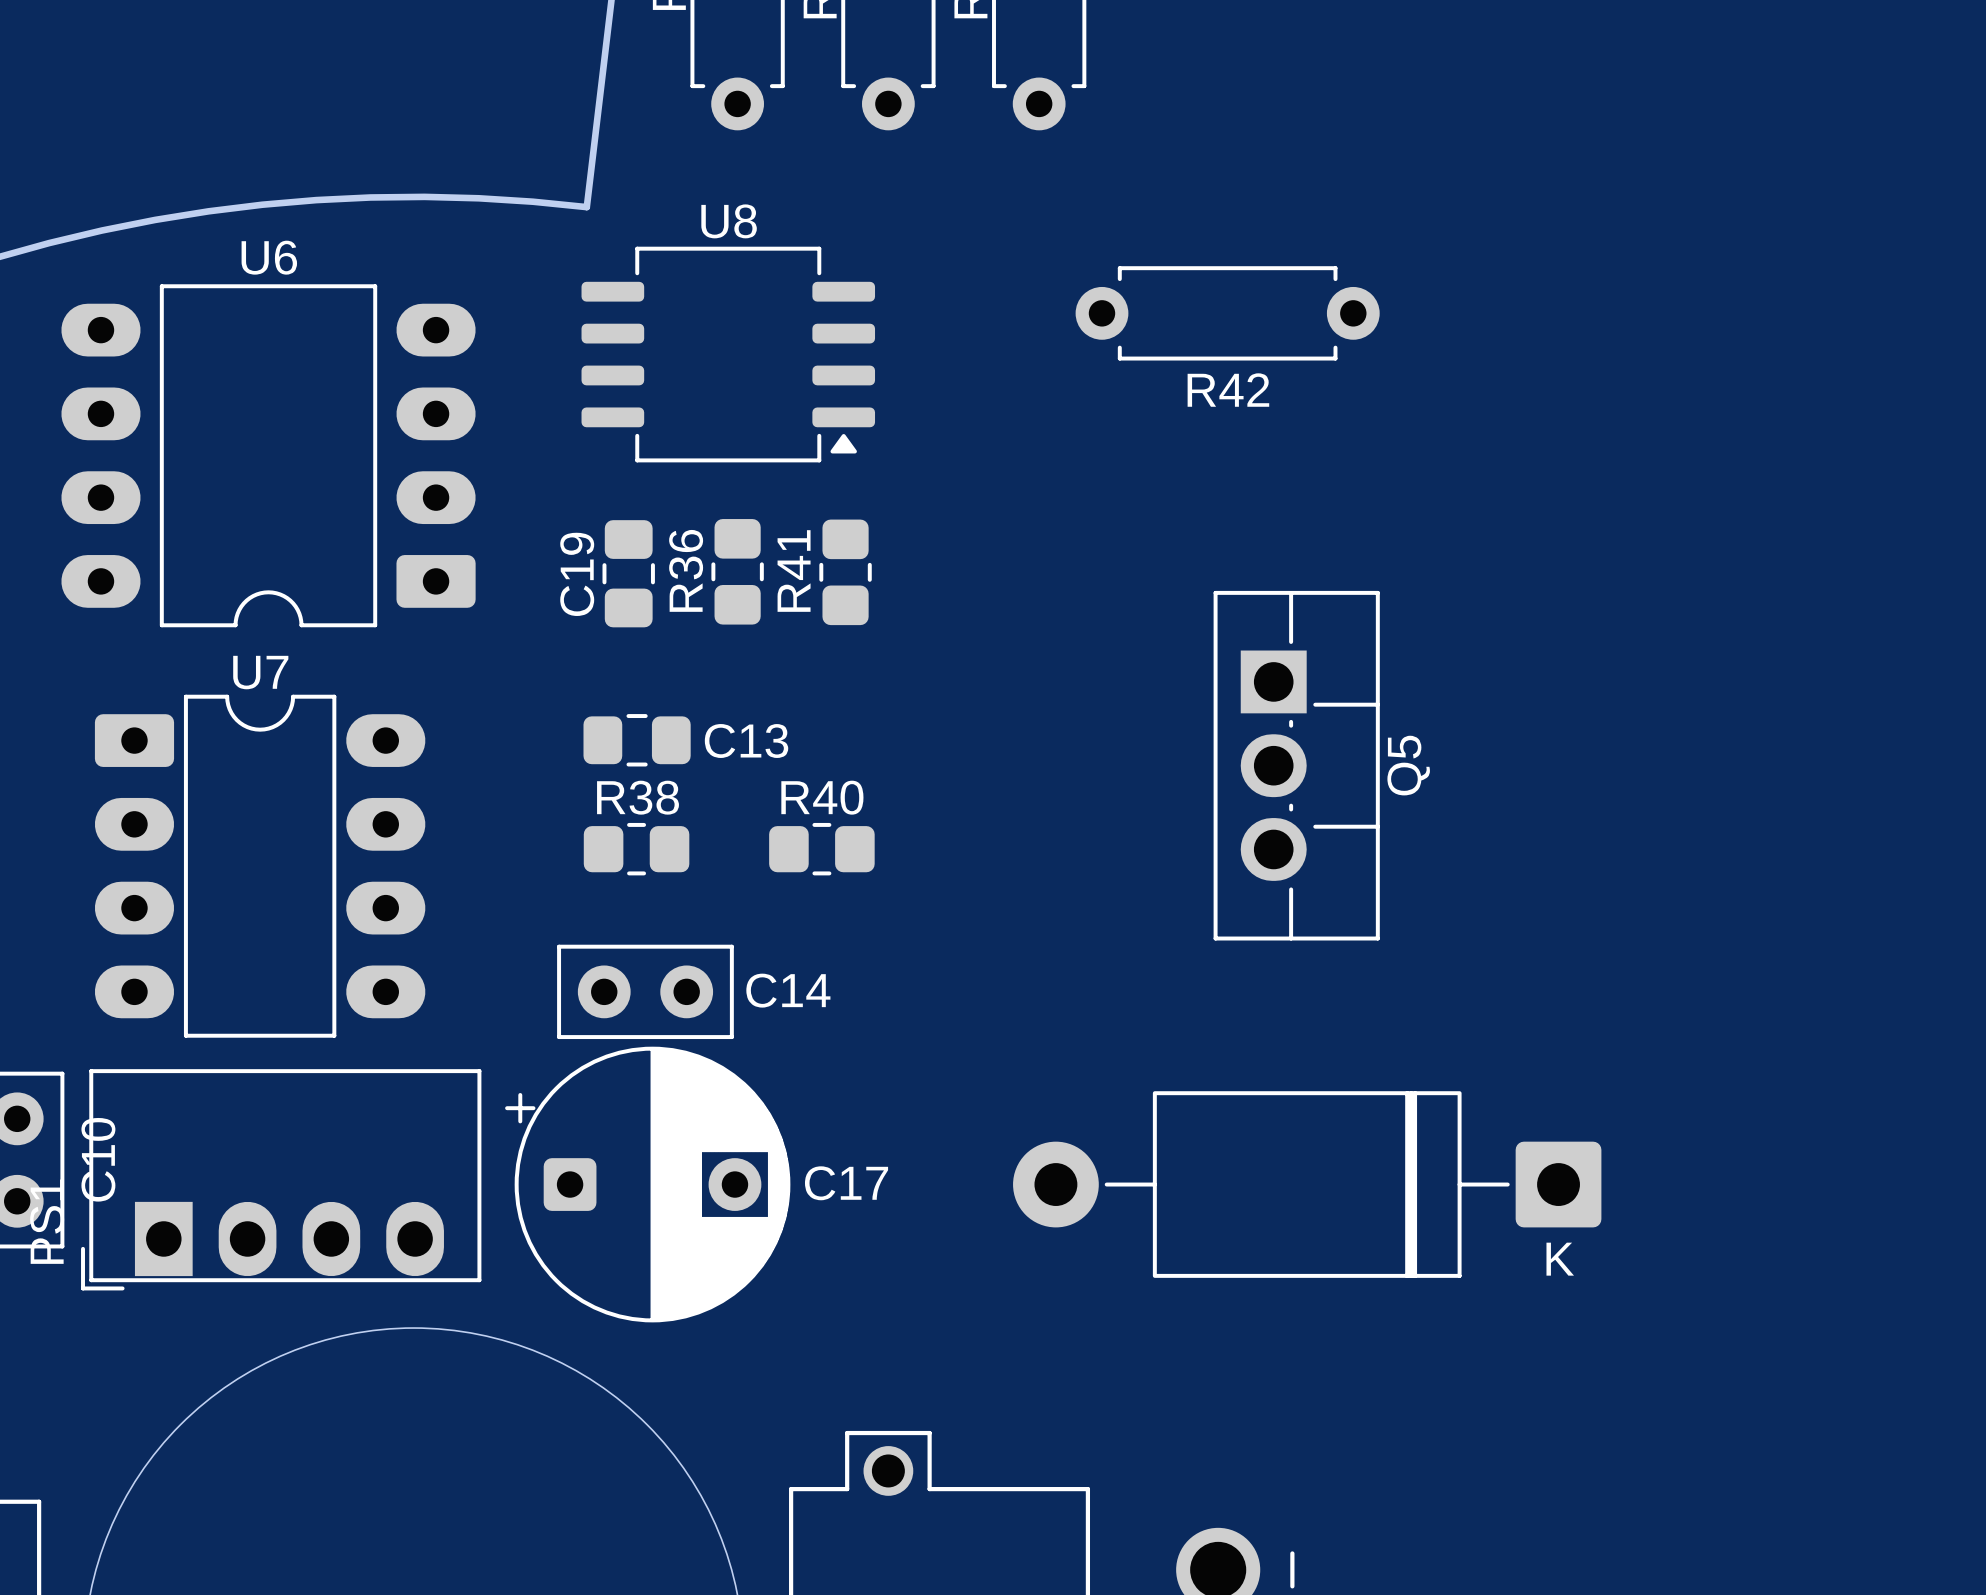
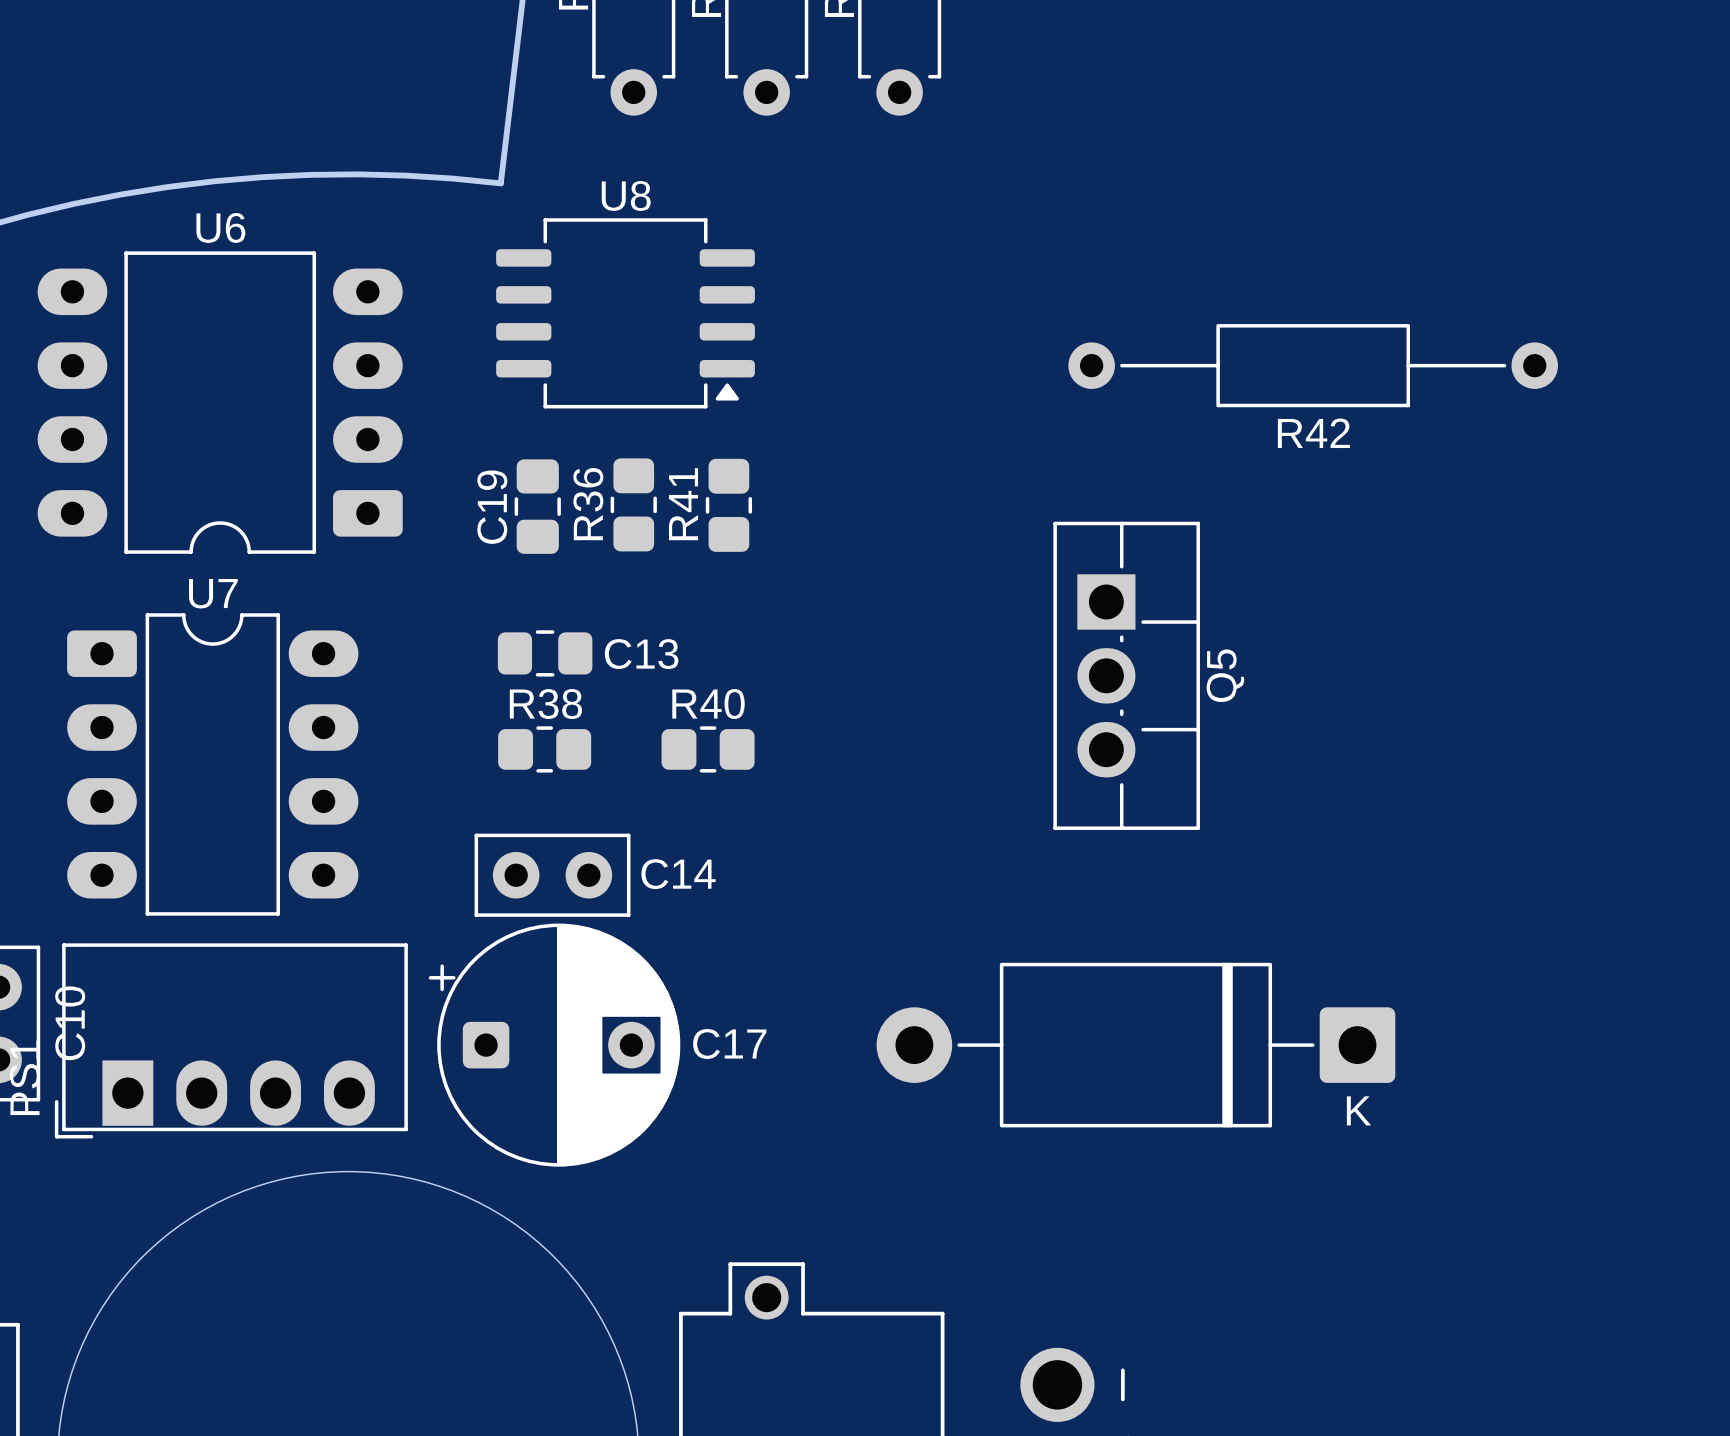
R42 footprint: [1075, 266, 1380, 361] -> [1068, 324, 1559, 408]

